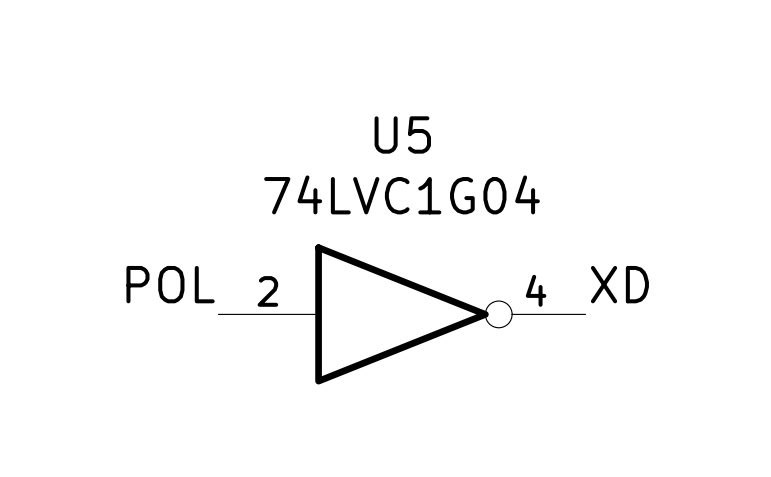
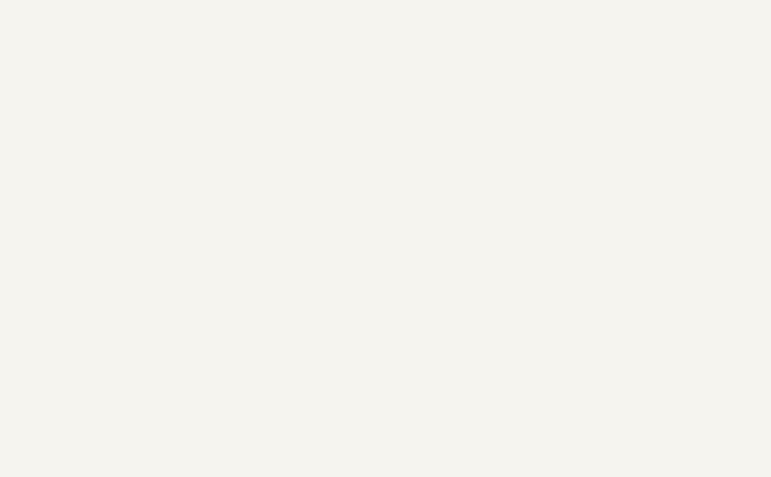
label: POL (170, 284) -> none
label: XD (619, 284) -> none
U5: 74LVC1G04 (401, 314) -> none

